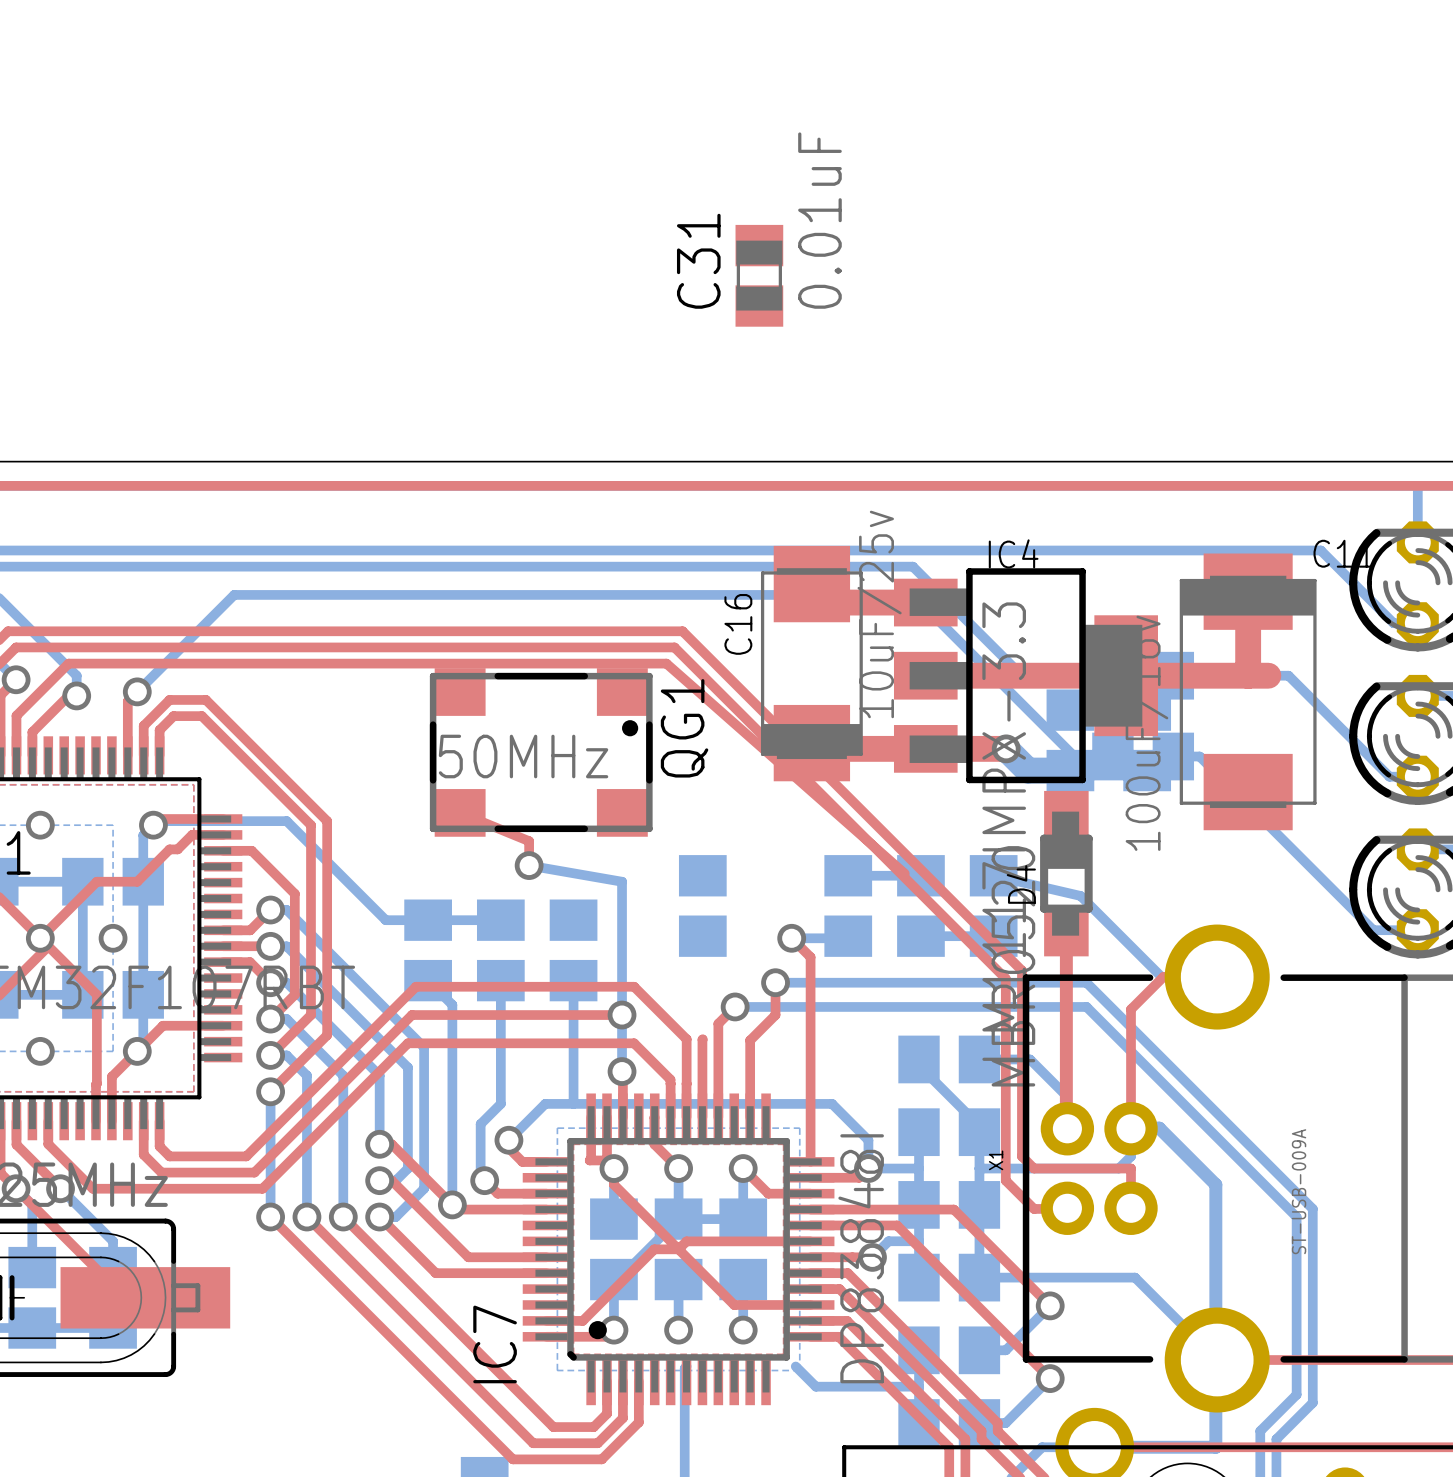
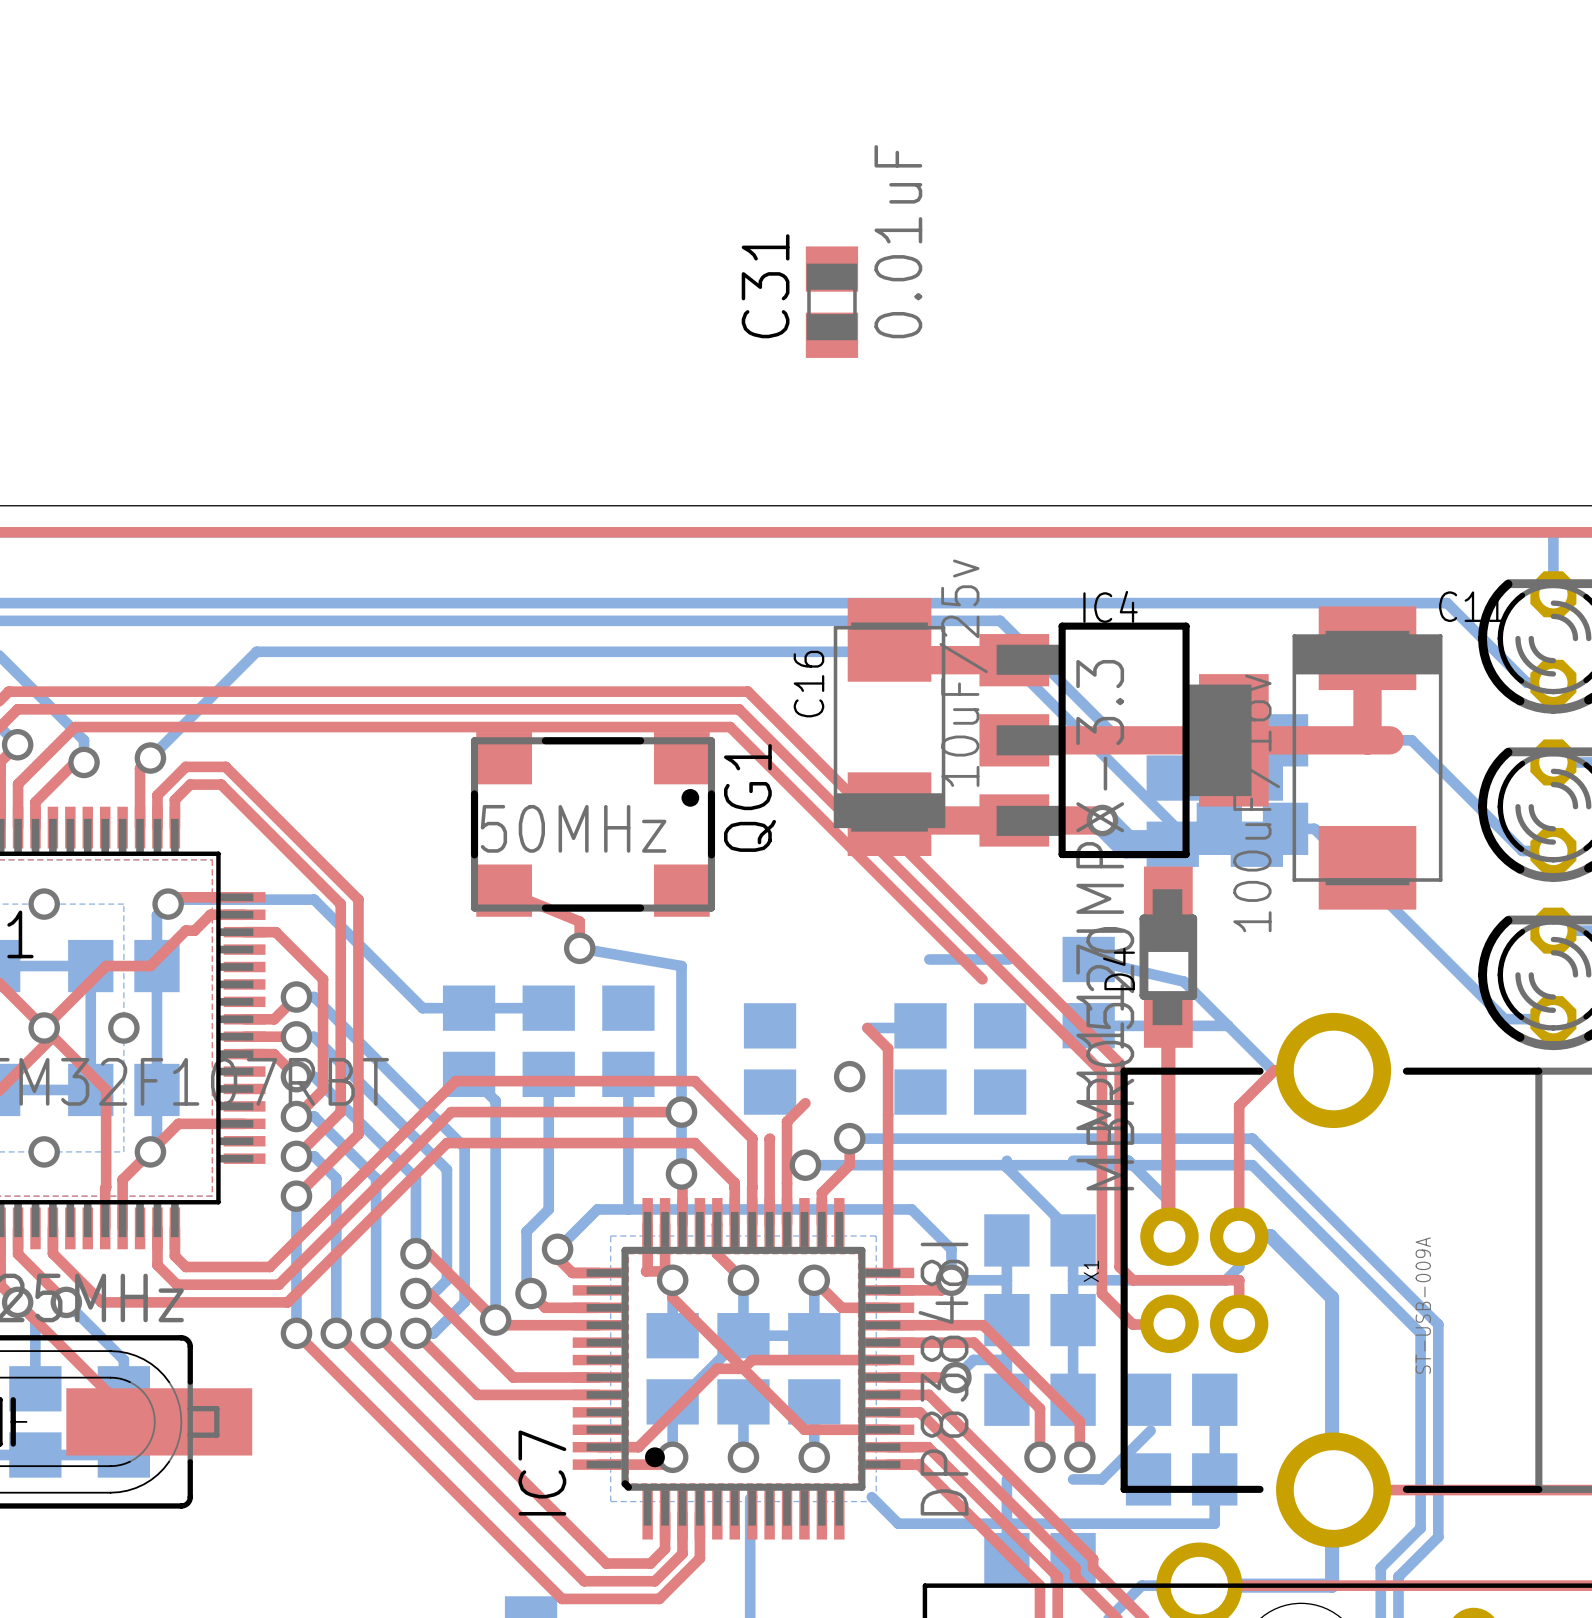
top track: (666, 663) (904, 873) -> (730, 727) (982, 979)
part position: (702, 905) -> (770, 1058)
part: (848, 905) -> none
part: (920, 905) -> none
via: (791, 938) -> none
part: none -> (920, 1058)
part: none -> (1000, 1058)
top track: (775, 982) (775, 1015) (750, 1040) (750, 1088) -> (849, 1138) (849, 1165) (821, 1193)
bottom track: (775, 982) (1086, 982) (1143, 1039) -> (849, 1138) (1252, 1138)
bottom track: (735, 1006) (1086, 1006) (1143, 1063) -> (805, 1165) (1252, 1165)
via: (735, 1006) -> none
via: none -> (849, 1138)
part: (949, 1059) -> none
via: none -> (805, 1165)
top track: (897, 1209) (953, 1209) (1050, 1305) -> (983, 1325) (1079, 1421) (1079, 1457)
top track: (889, 1225) (897, 1225) (1050, 1378) -> (974, 1342) (1039, 1408) (1039, 1457)
bottom track: (979, 1277) (1135, 1277) (1215, 1358) -> none
part: none -> (1181, 1399)
via: (1050, 1305) -> none
via: none -> (1039, 1457)
via: none -> (1079, 1457)
part: (949, 1350) -> none
part: none -> (1181, 1479)
bottom track: (1050, 1378) (1005, 1423) (979, 1423) -> none
via: (1050, 1378) -> none
bottom track: (815, 1386) (919, 1386) -> (893, 1519) (898, 1523) (1214, 1523) (1214, 1399)

